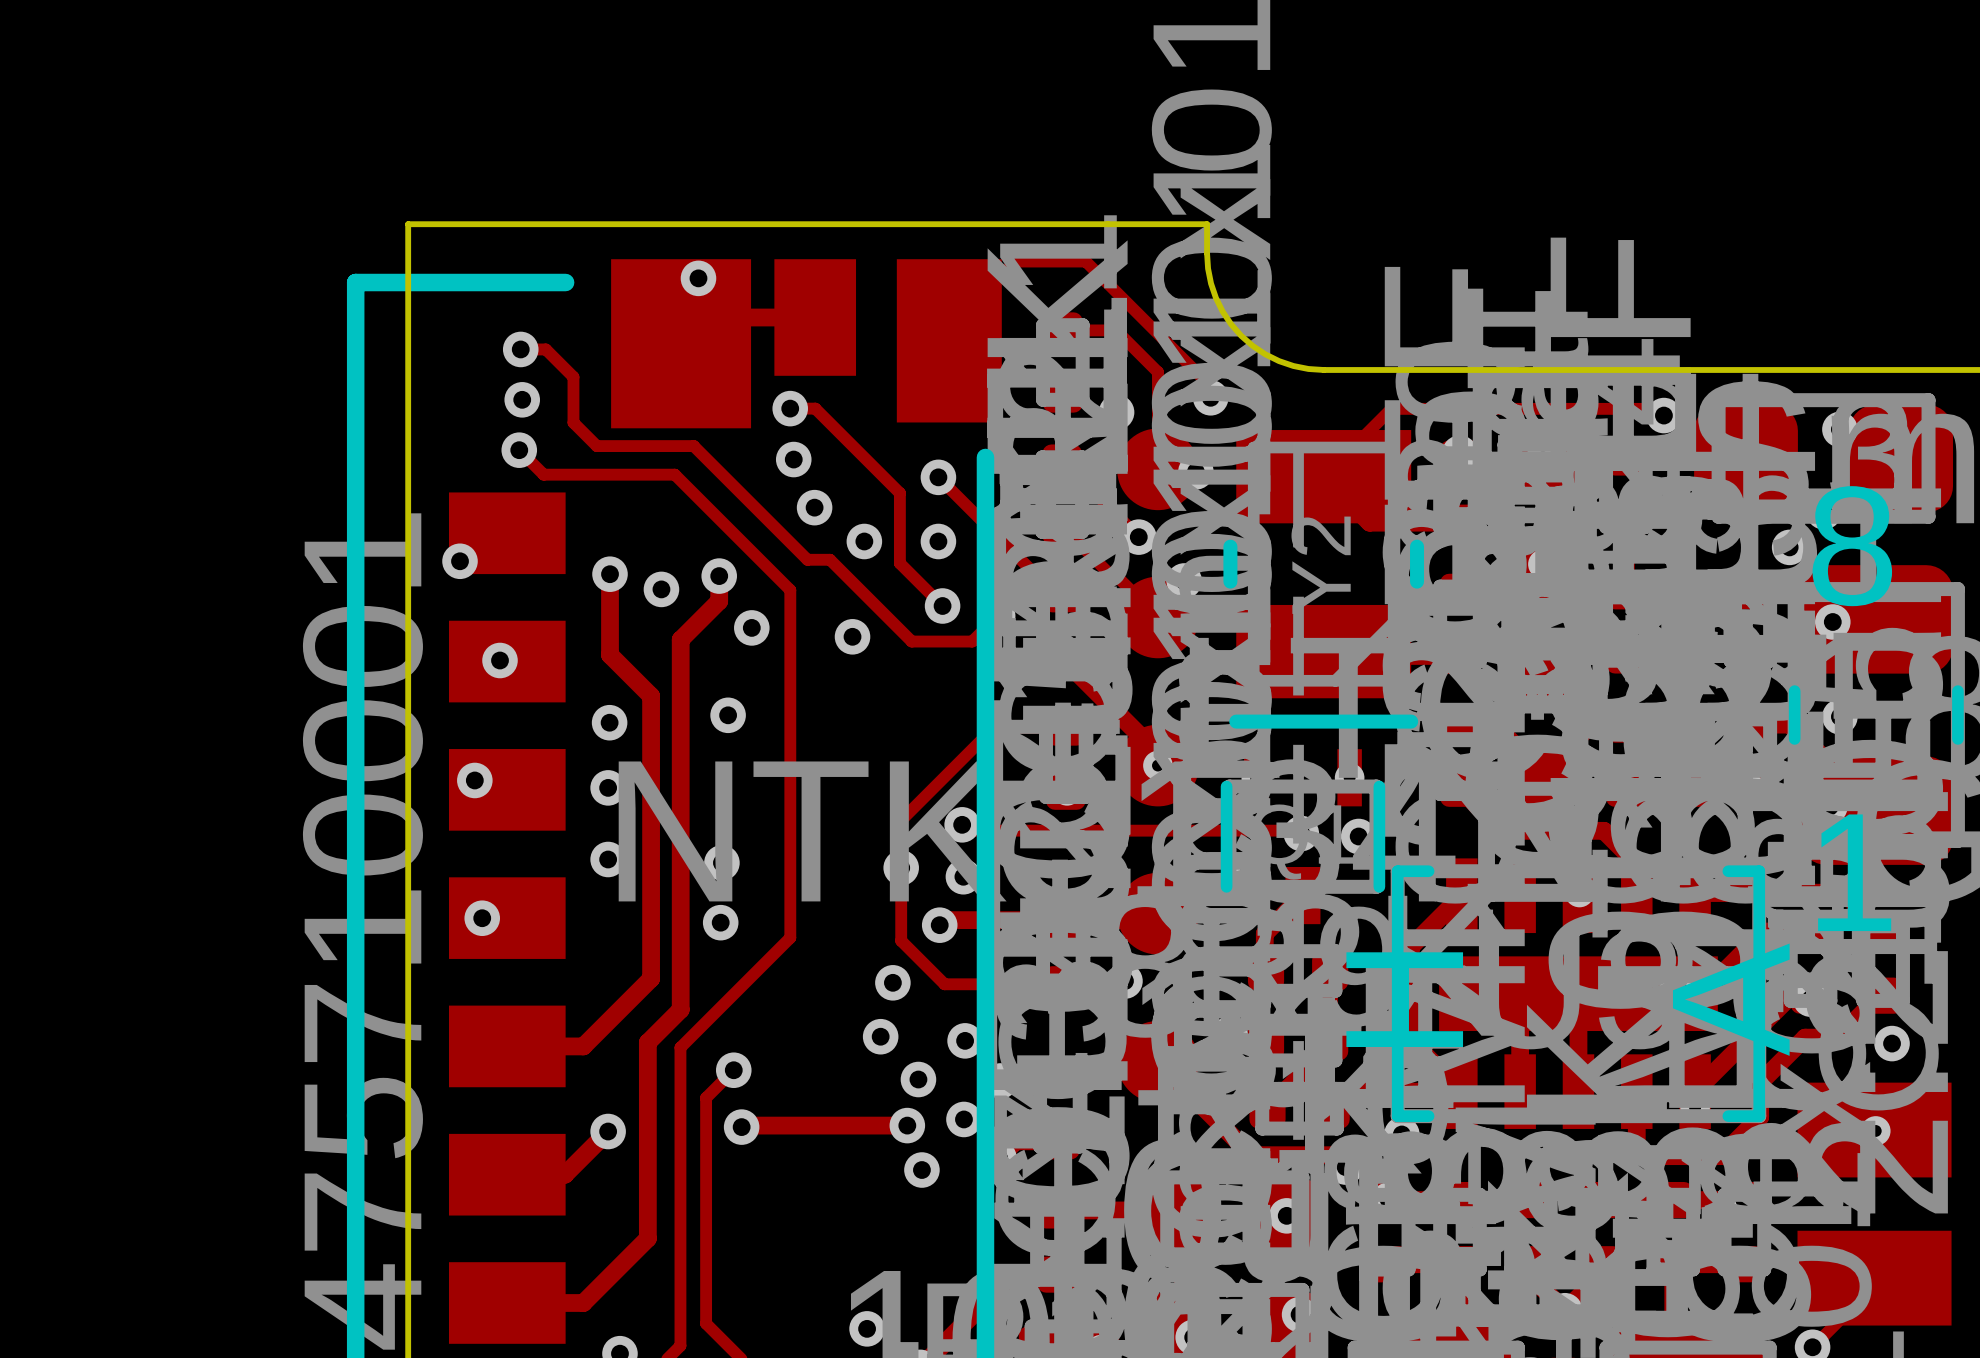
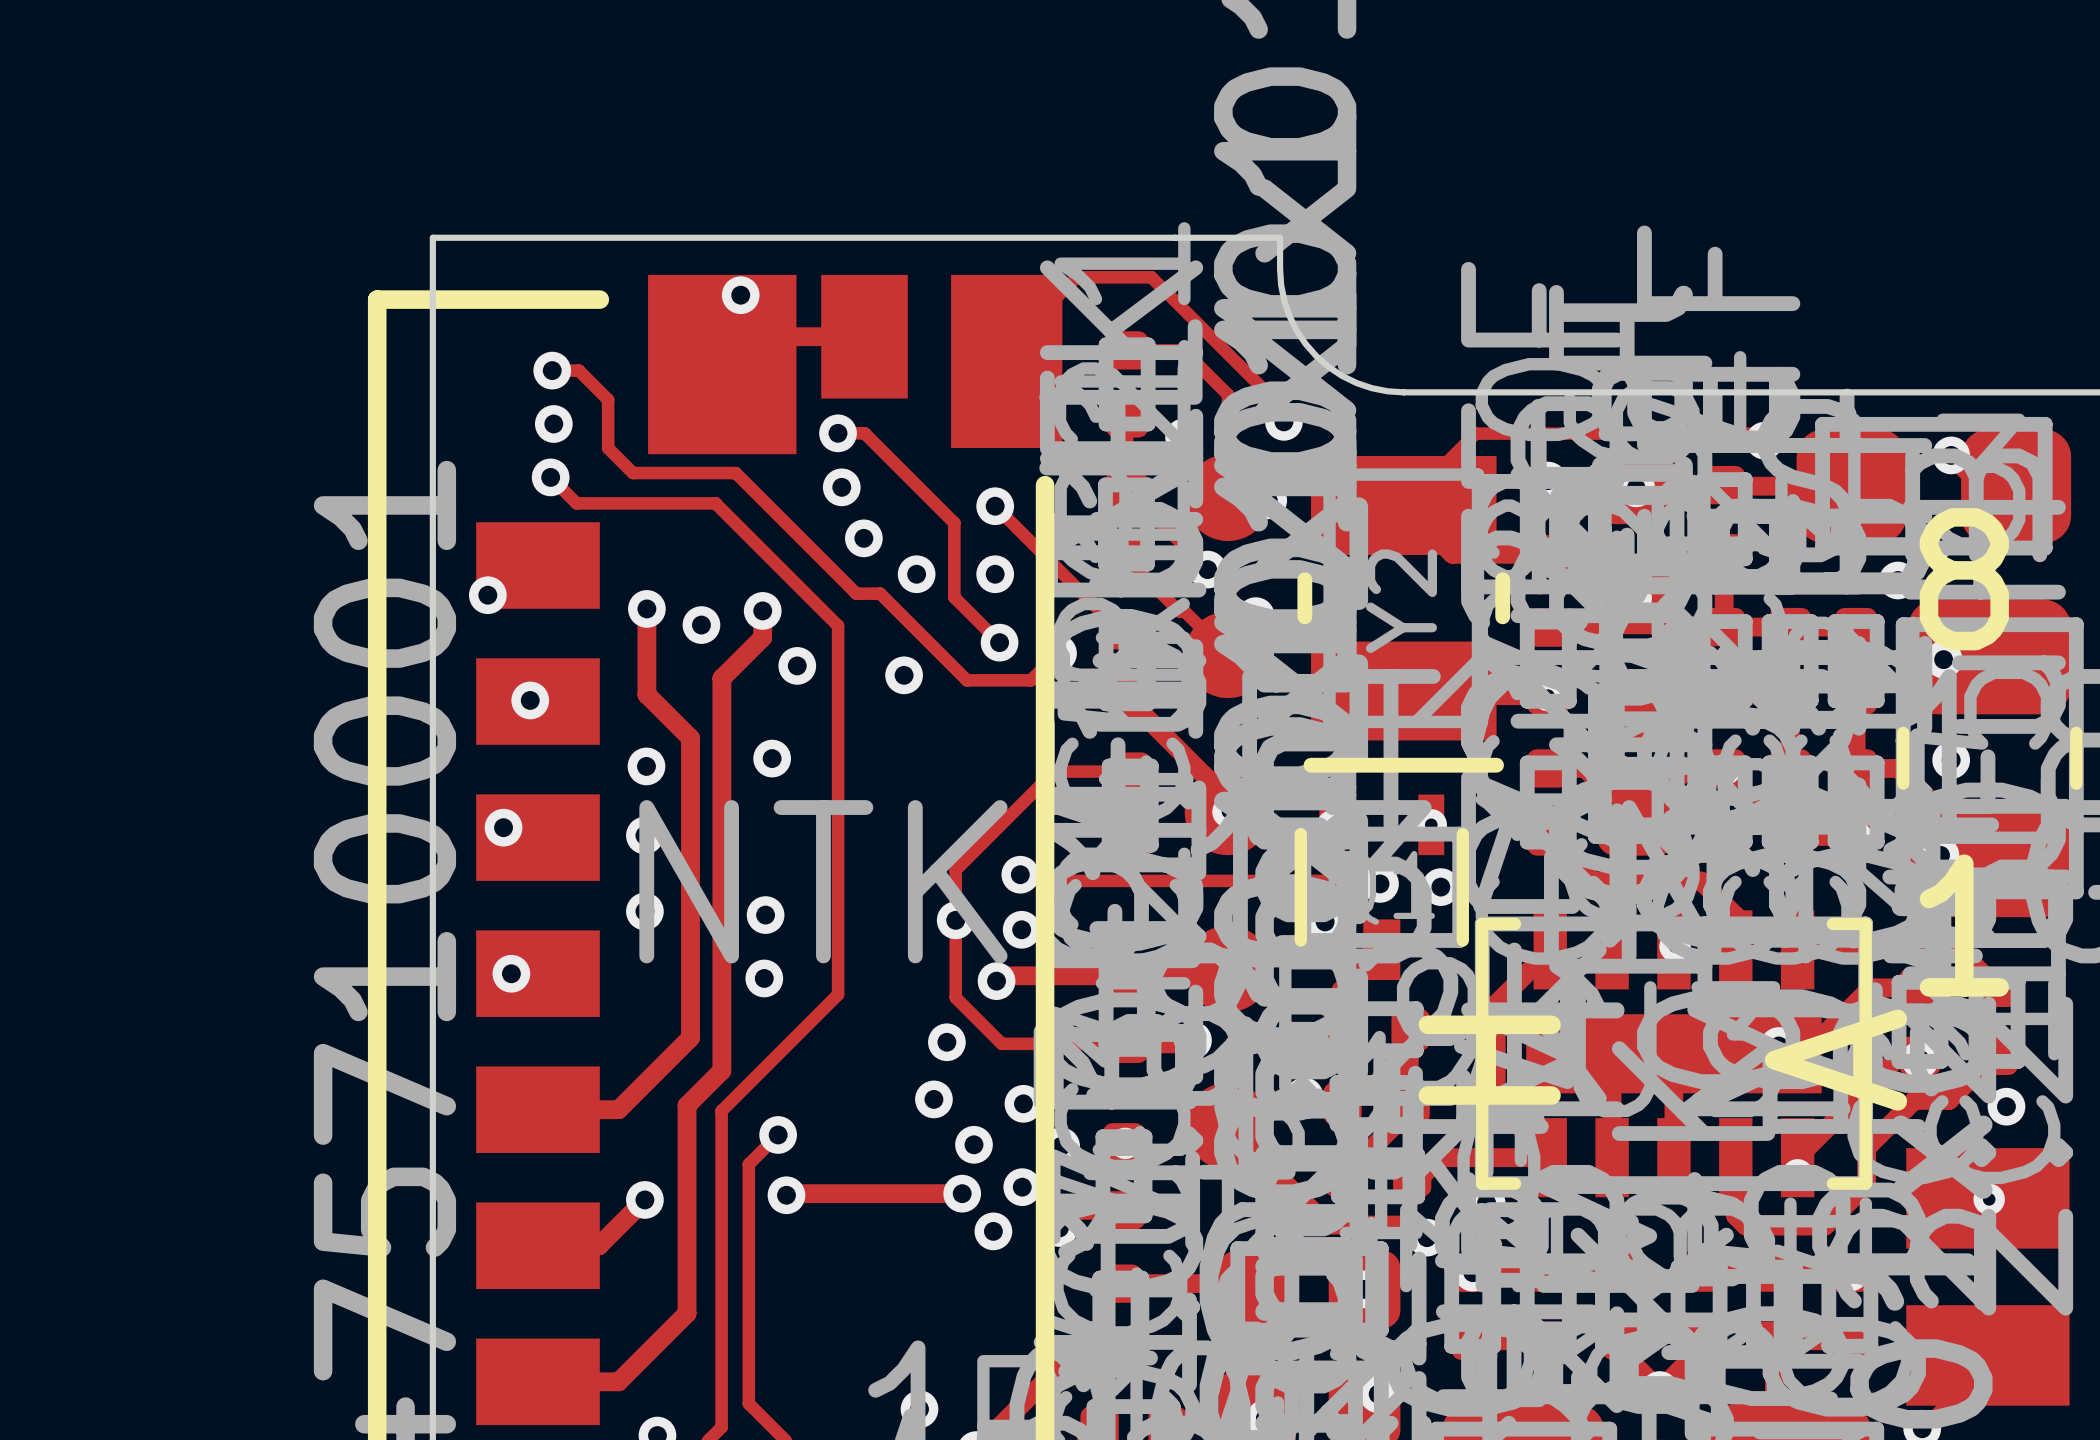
via position: (921, 1170) -> (993, 1231)

